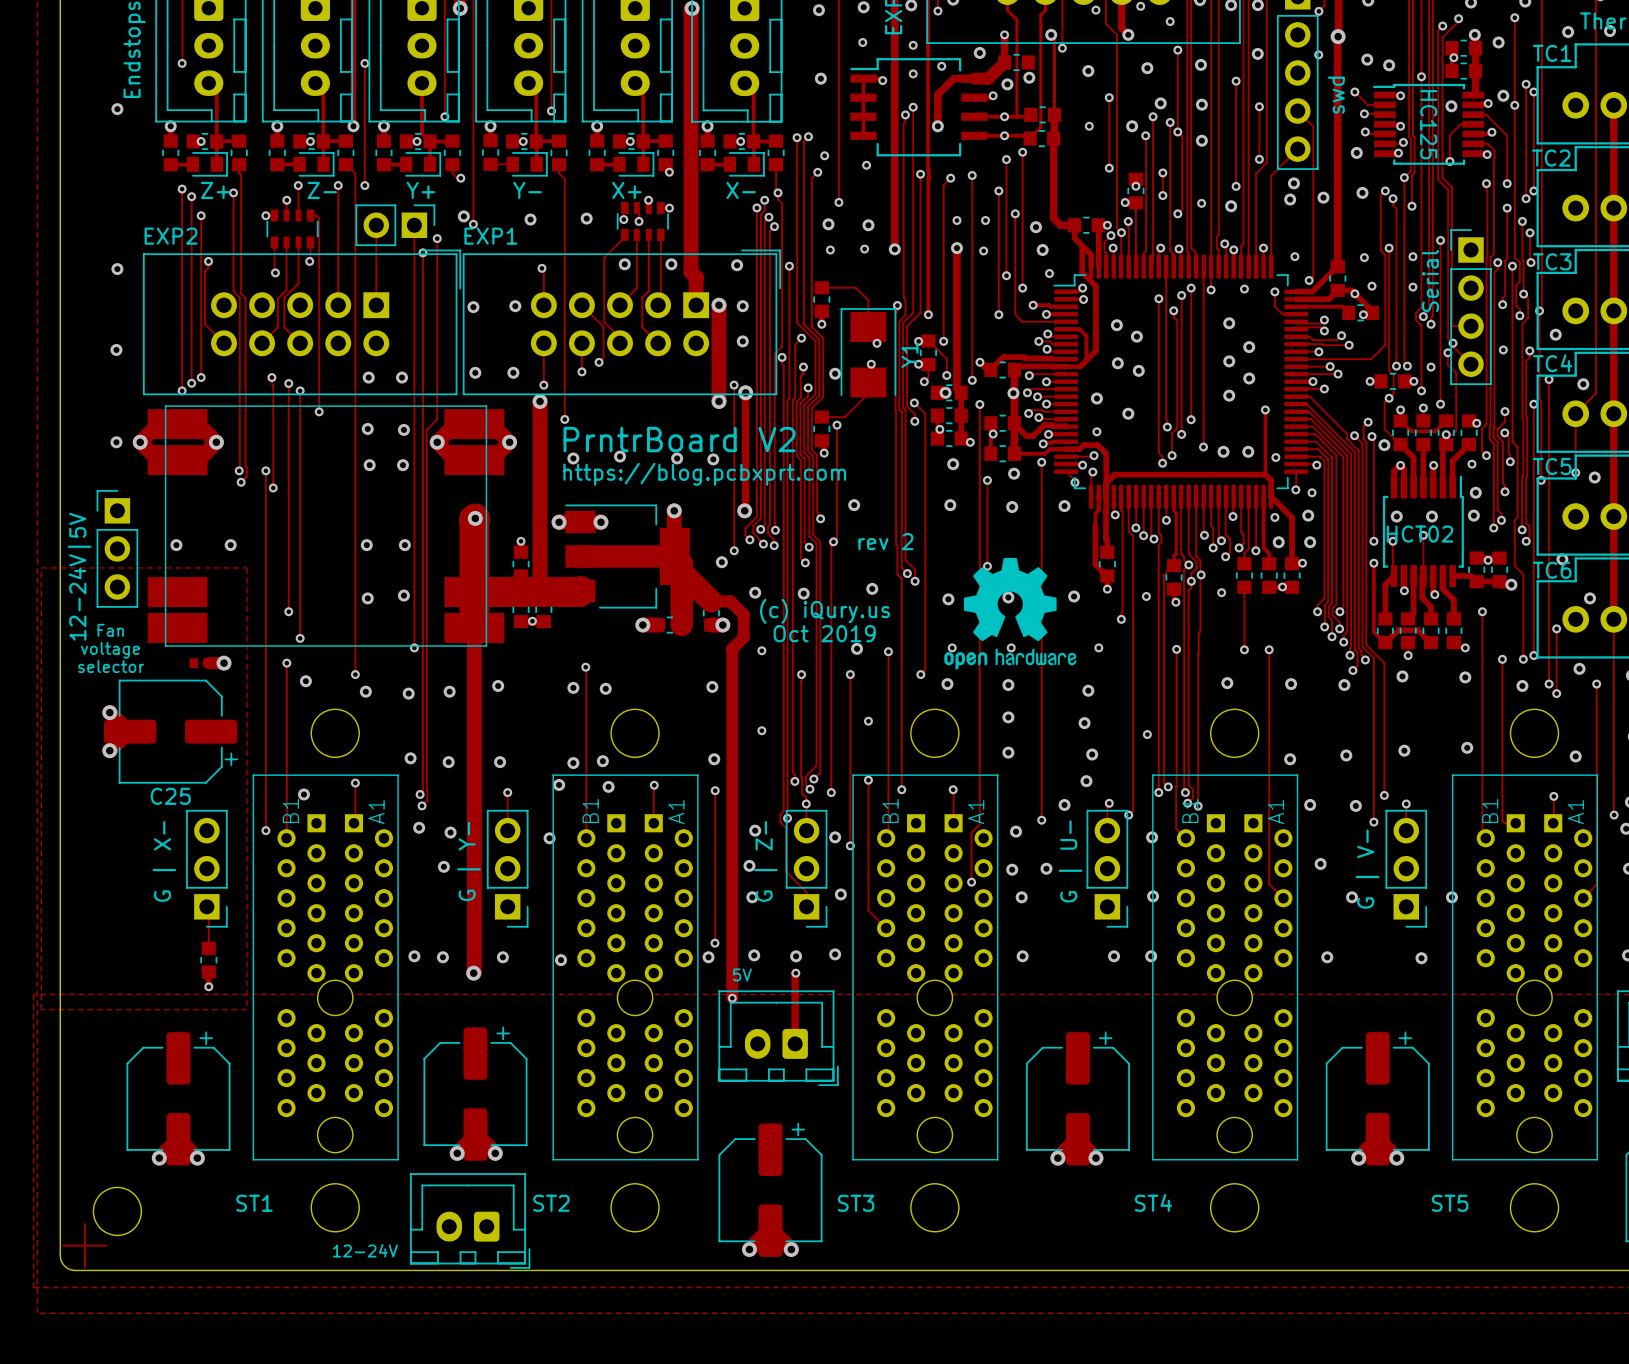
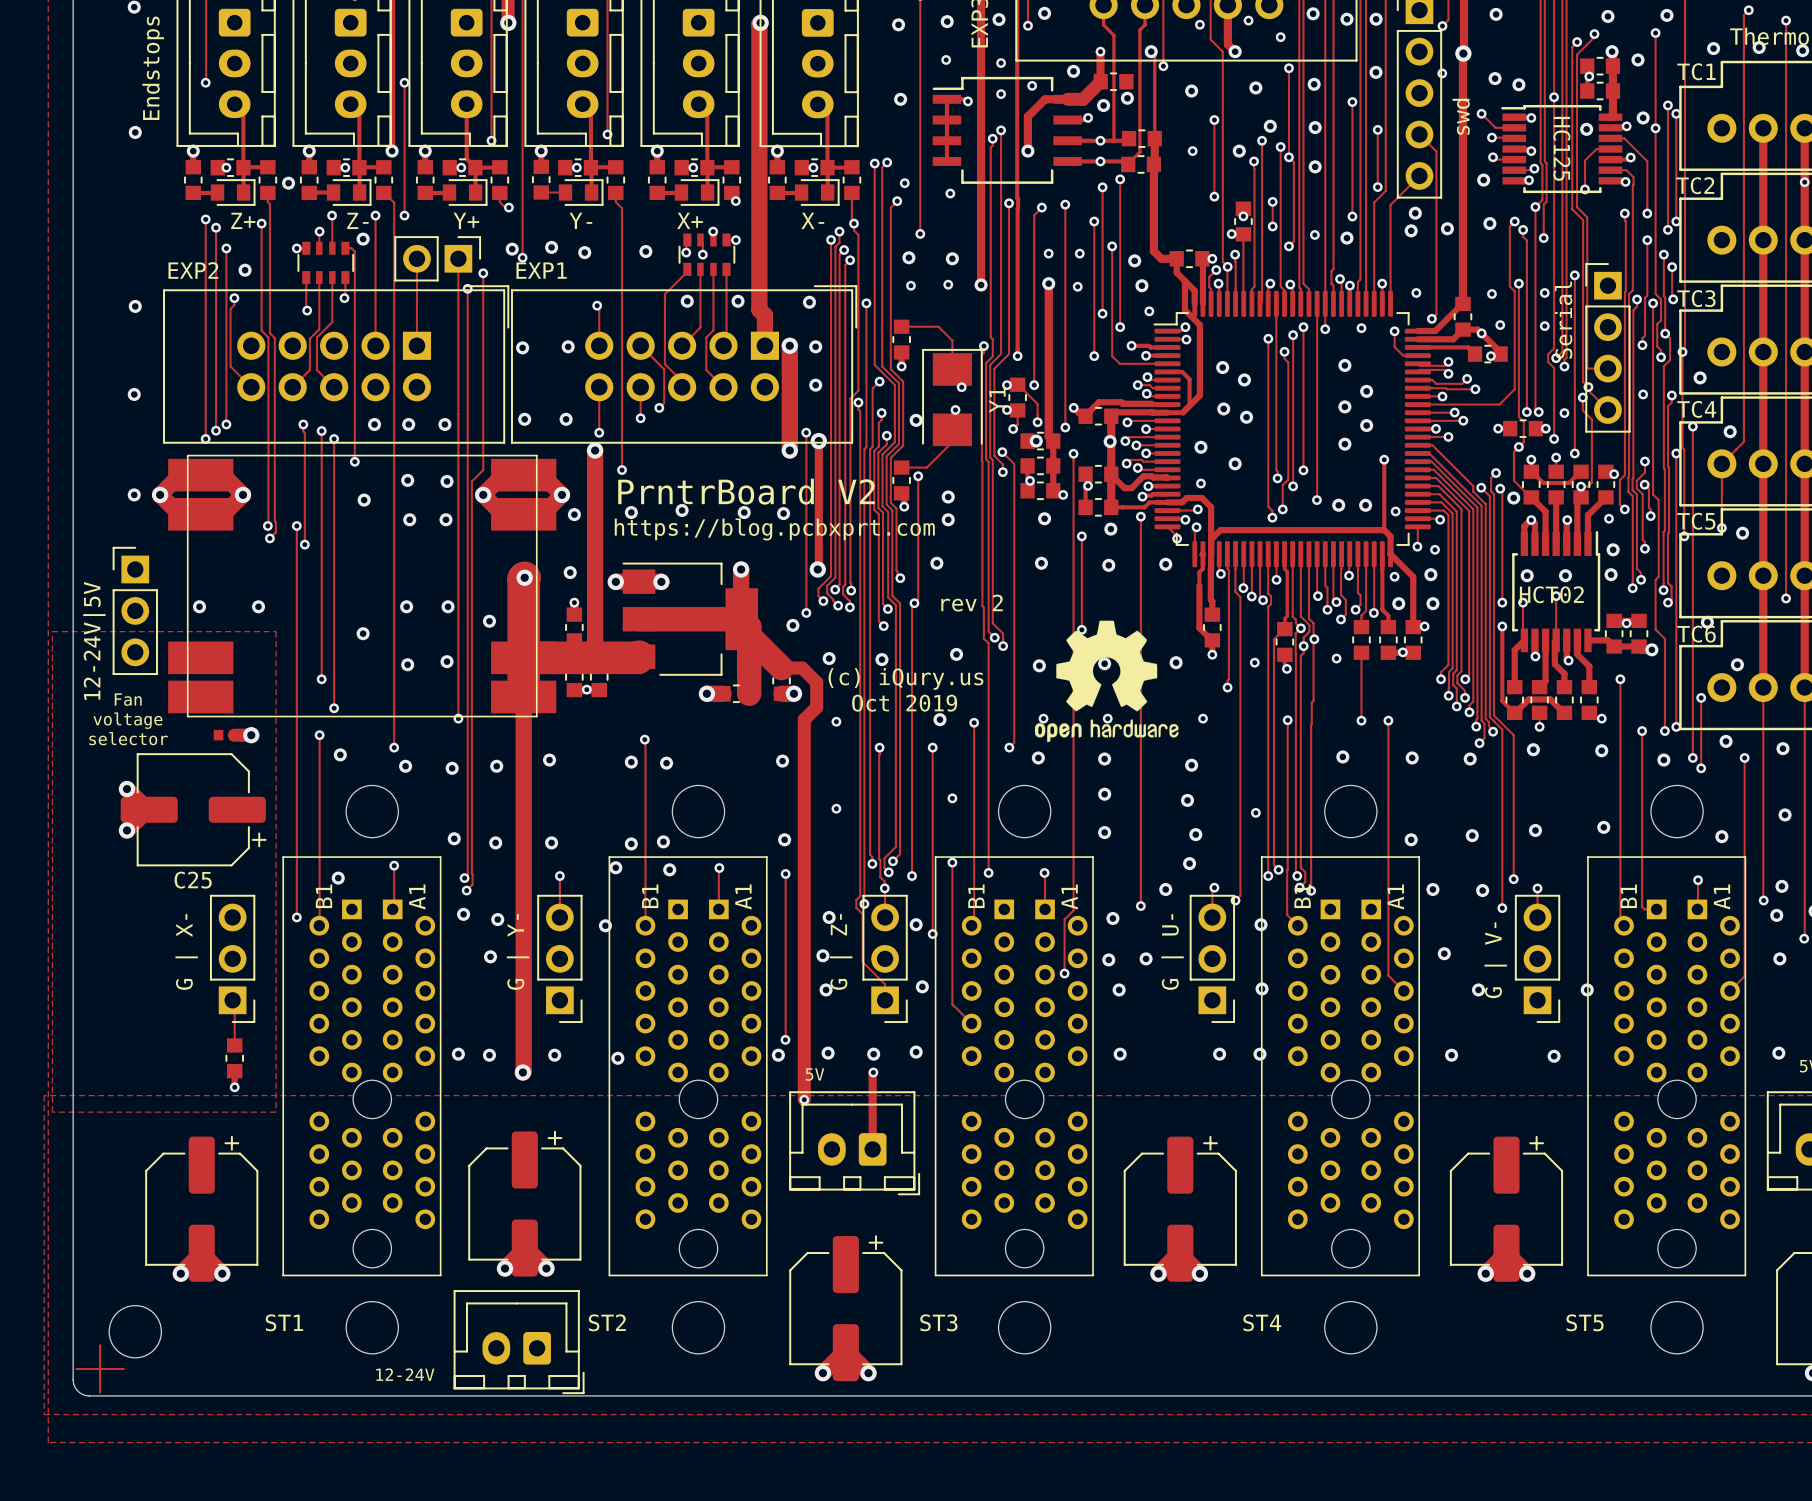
via: none -> (288, 183)
via: none -> (363, 239)
via: none -> (551, 247)
via: none -> (245, 270)
via: none -> (374, 424)
via: none -> (948, 496)
via: none -> (364, 500)
via: none -> (574, 514)
via: none -> (948, 519)
via: none -> (570, 572)
via: none -> (489, 621)
via: none -> (363, 633)

